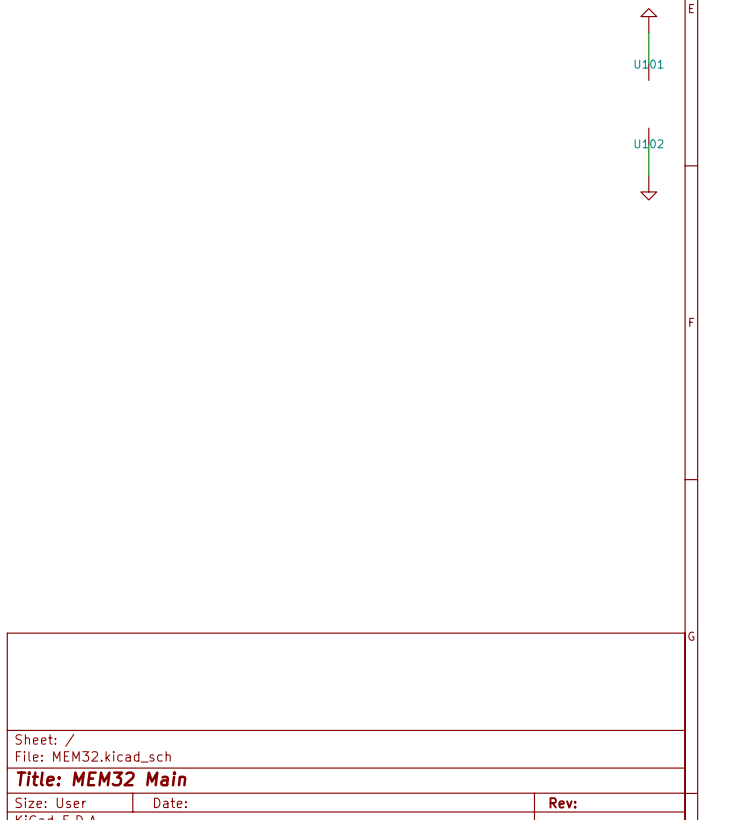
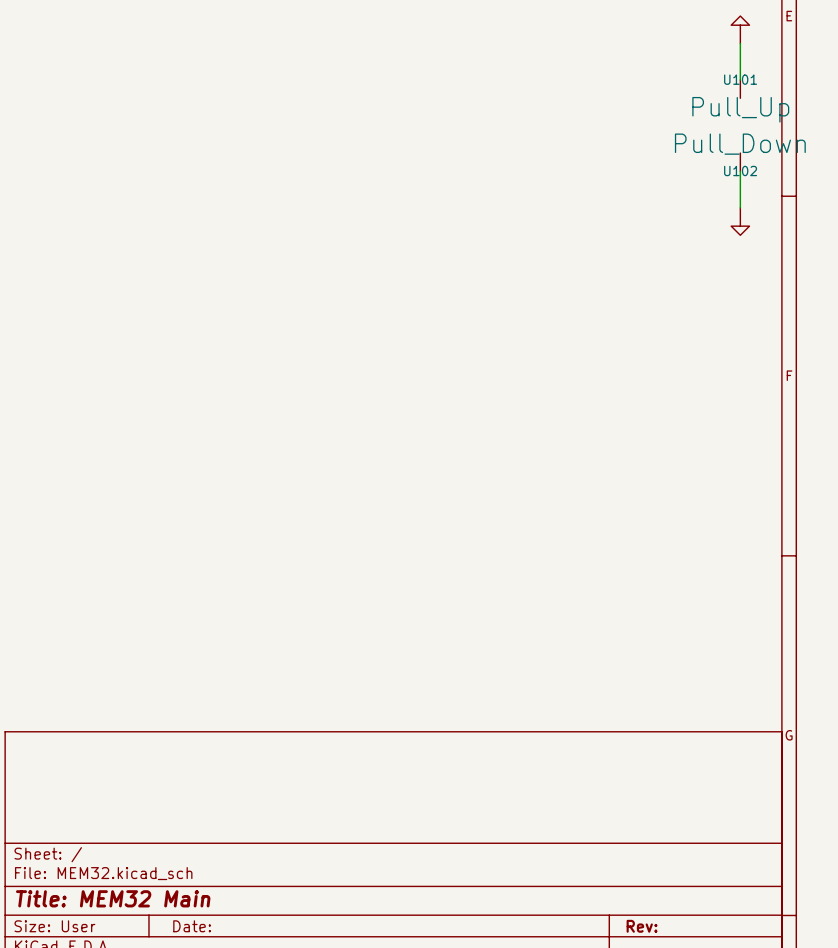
U101 value: none -> Pull_Up (740, 109)
U102 value: none -> Pull_Down (740, 144)

